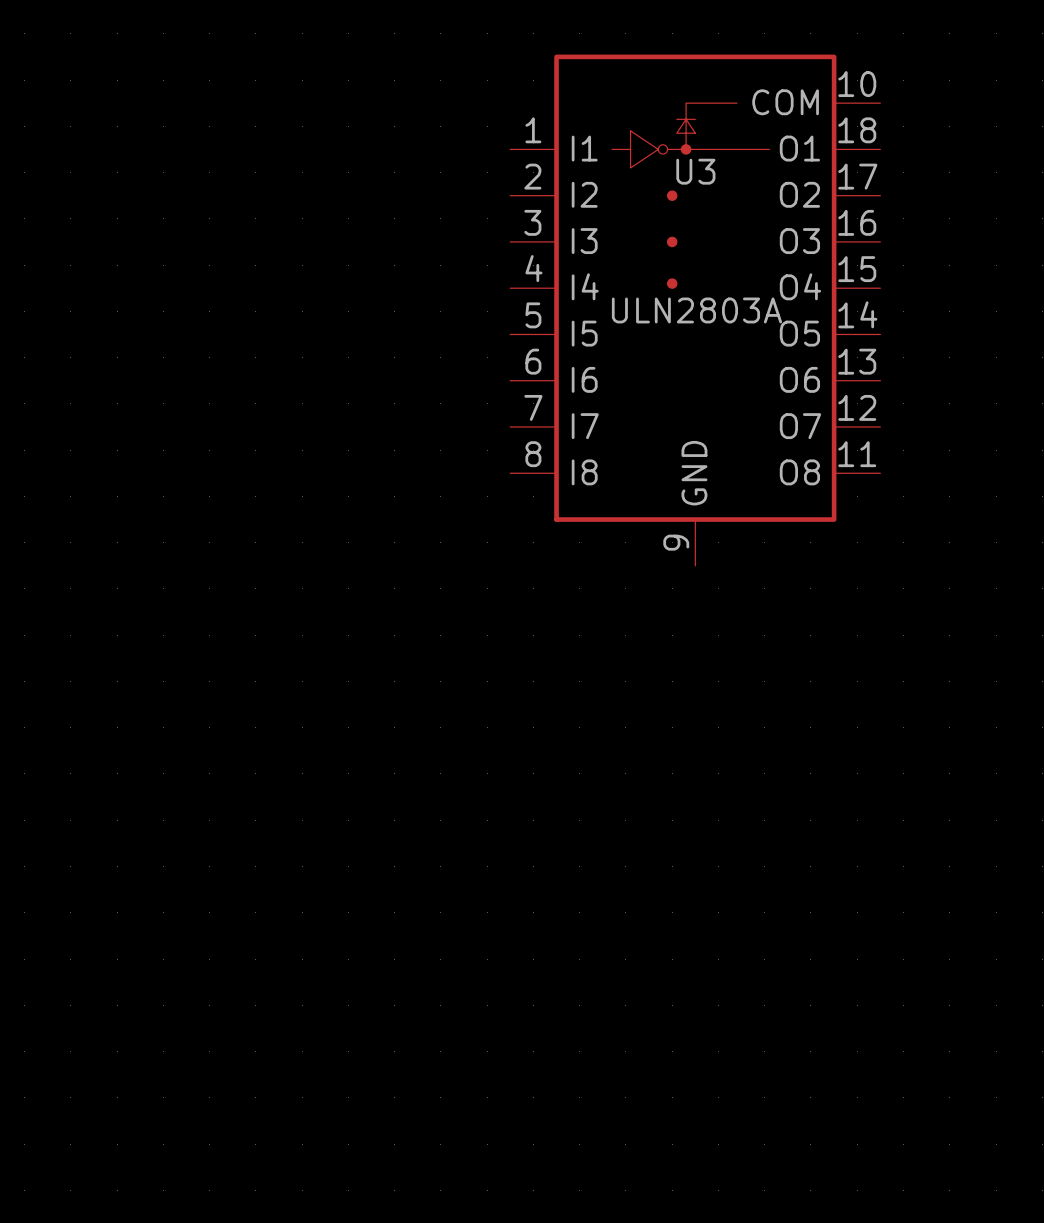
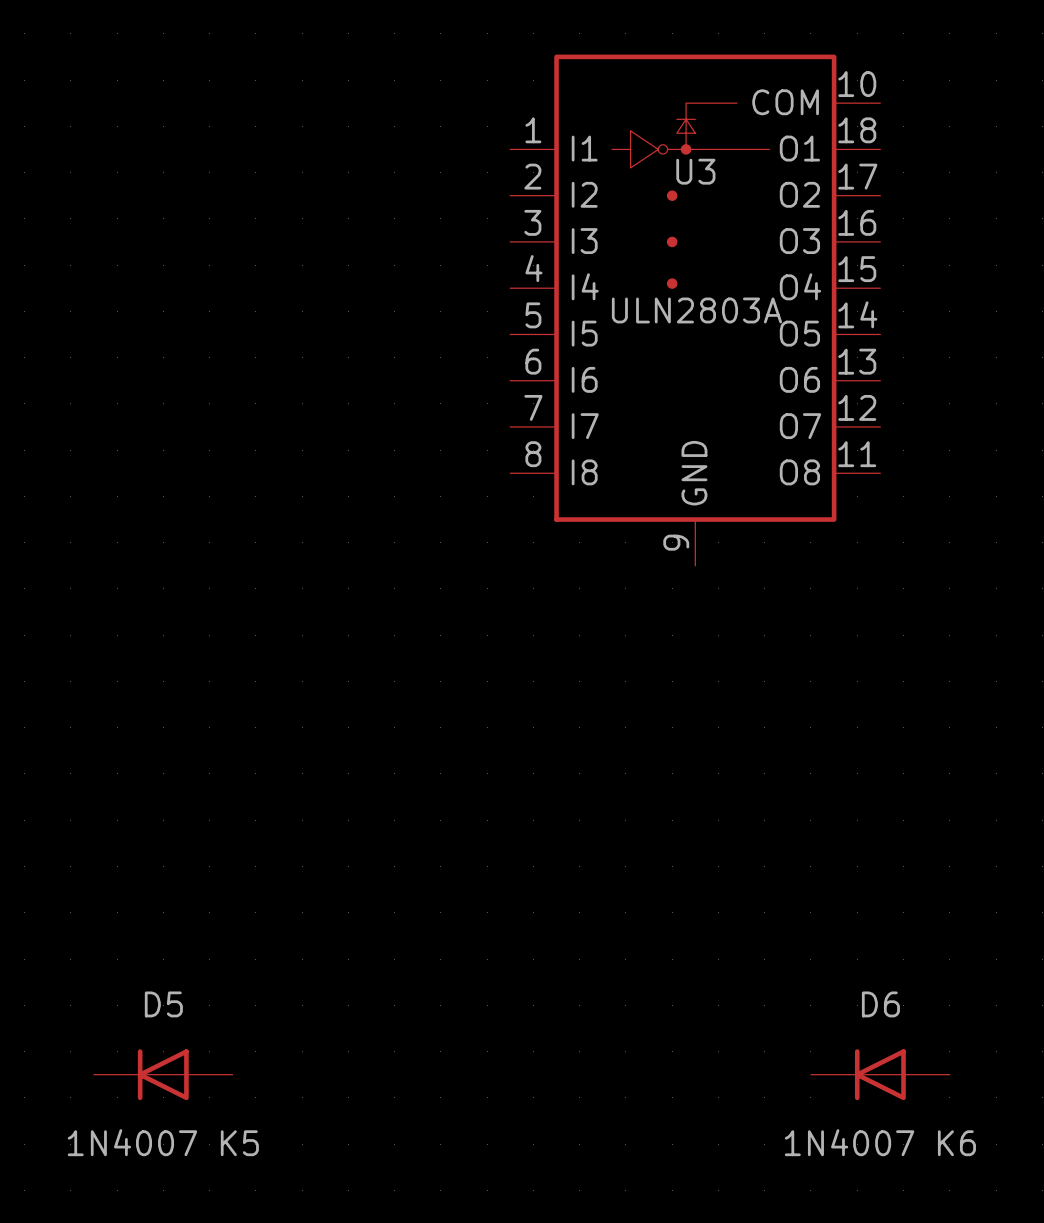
D5: none -> 1N4007 K5 (163, 1074)
D6: none -> 1N4007 K6 (880, 1074)

